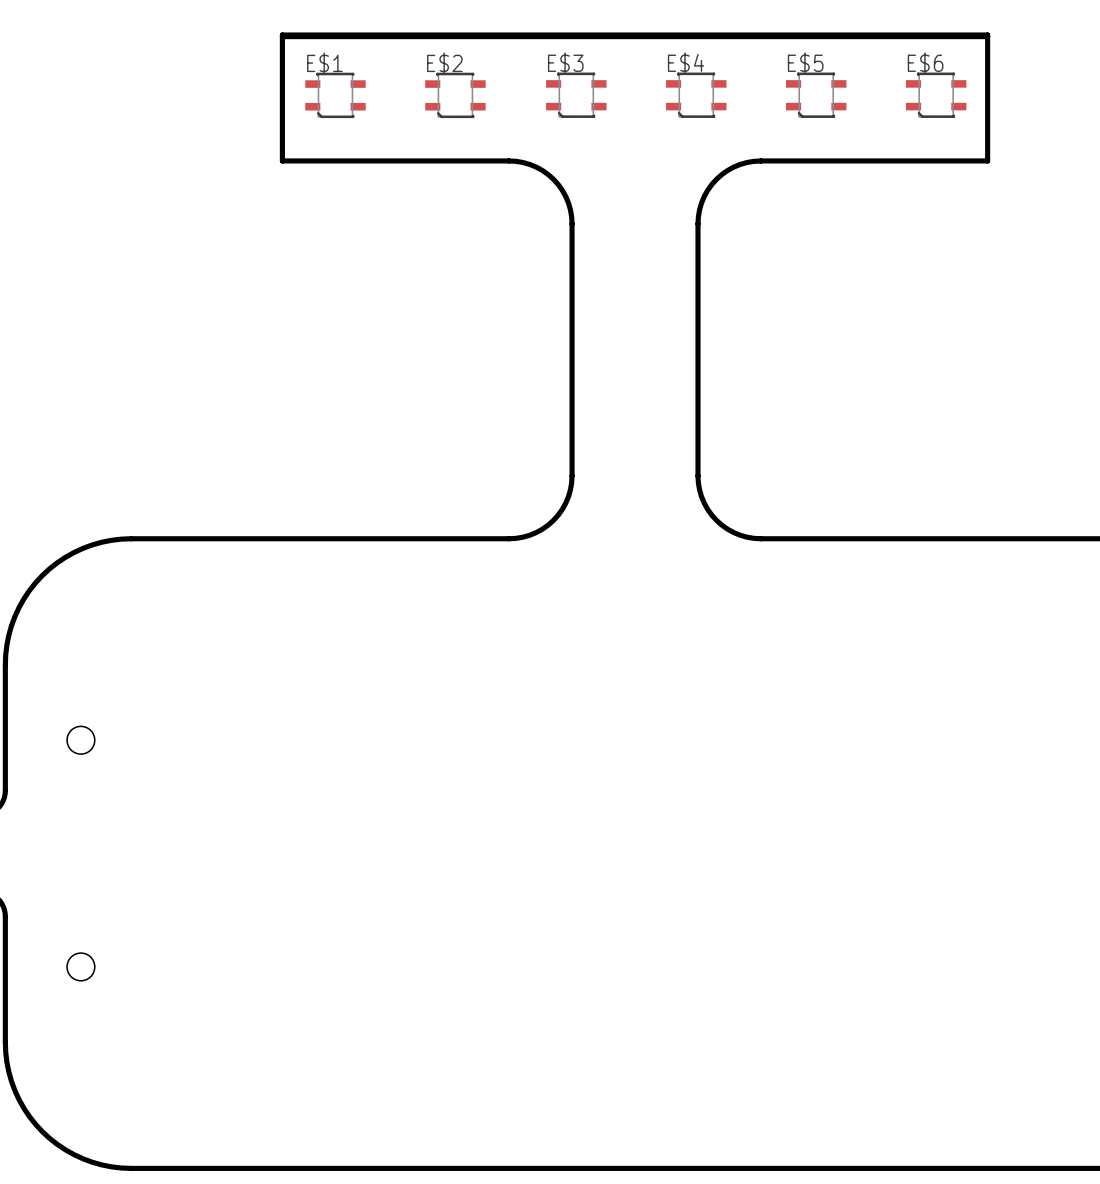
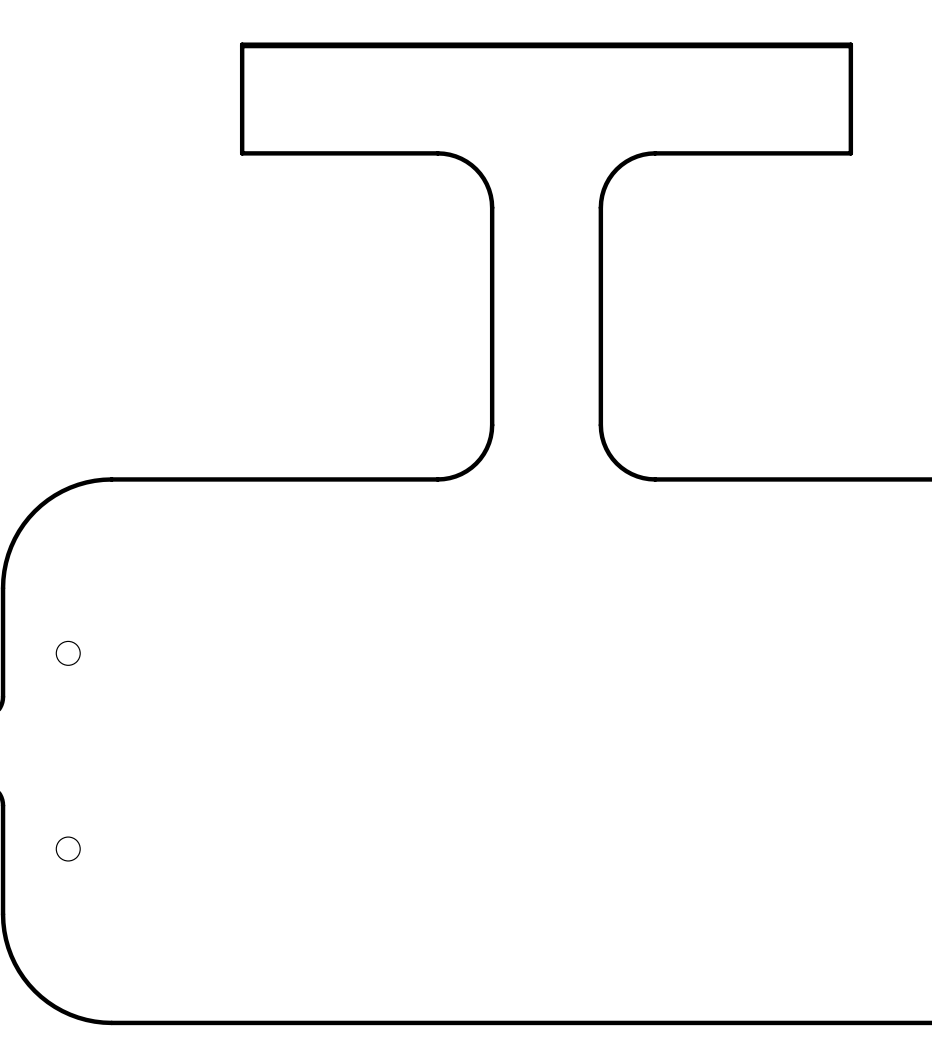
E$1: (335, 95) -> none
E$2: (455, 95) -> none
E$3: (576, 95) -> none
E$4: (696, 95) -> none
E$5: (816, 95) -> none
E$6: (936, 95) -> none

